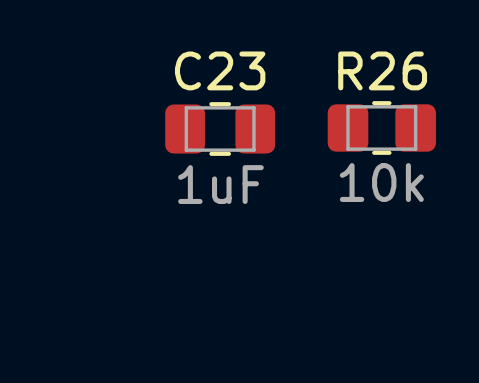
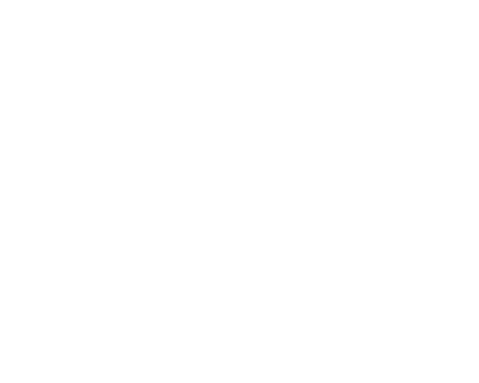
R26: 10k (381, 127) -> none
C23: 1uF (220, 129) -> none

